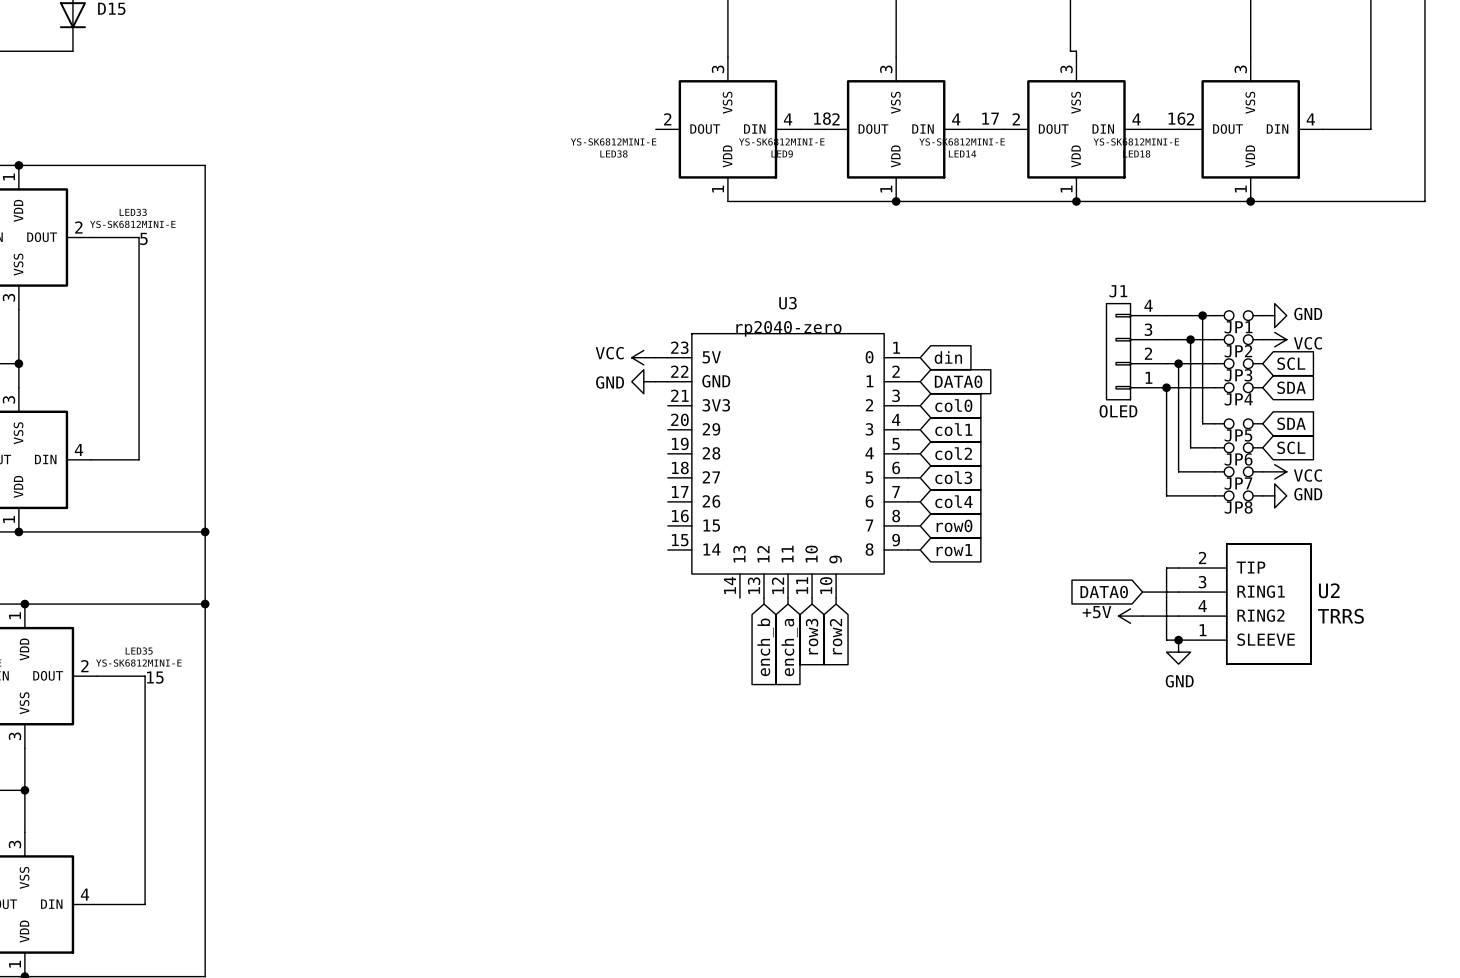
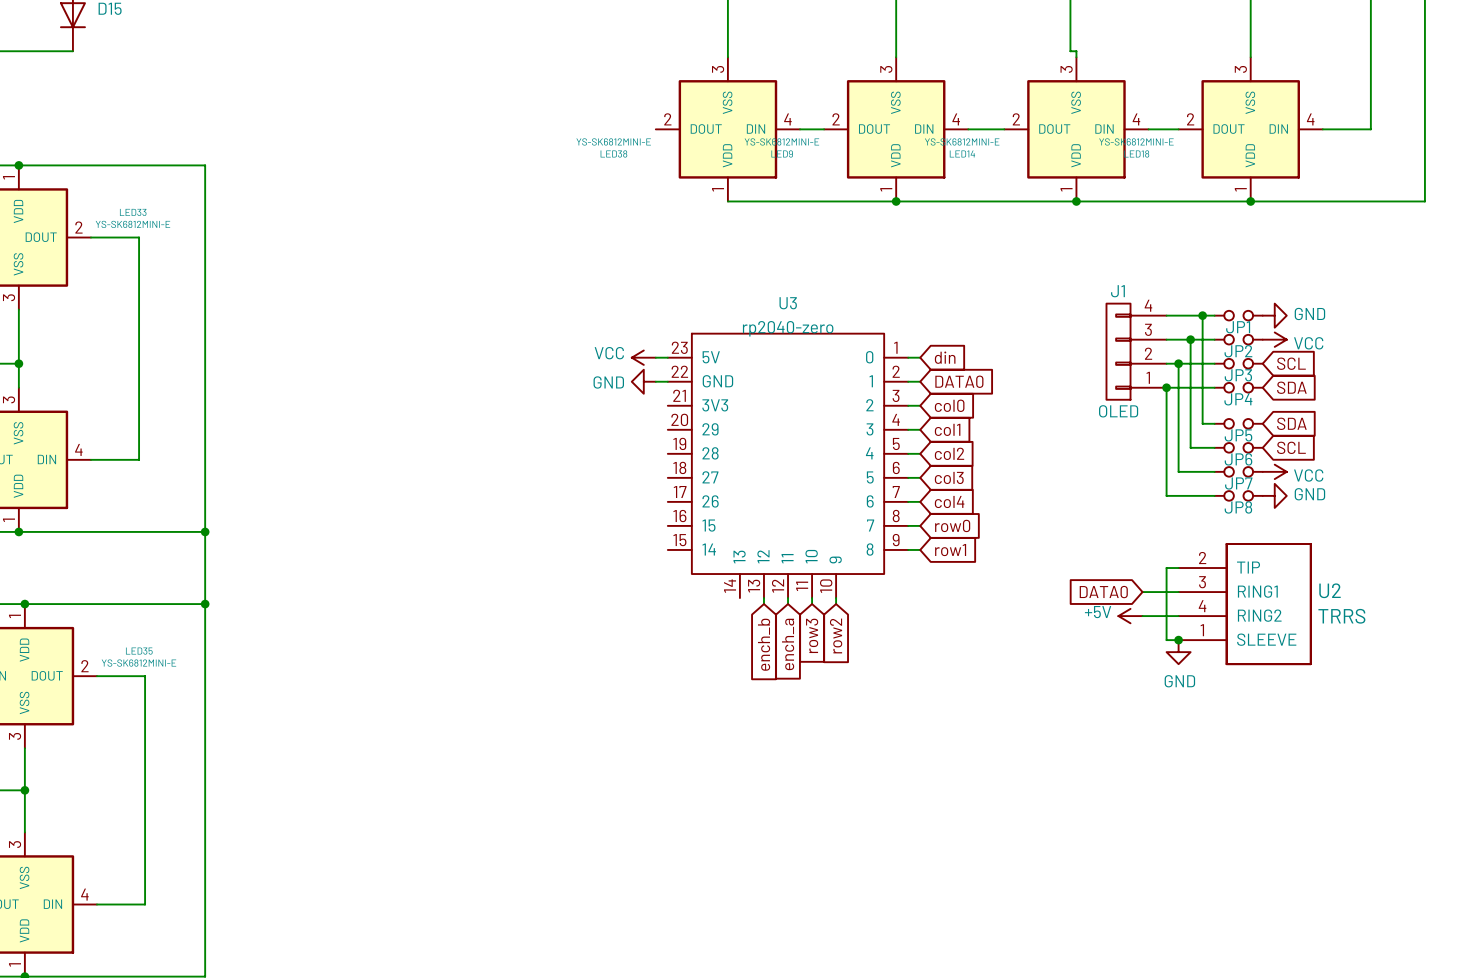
label: 18 (822, 118) -> none
label: 17 (990, 118) -> none
label: 16 (1176, 118) -> none
label: 5 (143, 238) -> none
label: 15 (155, 677) -> none

